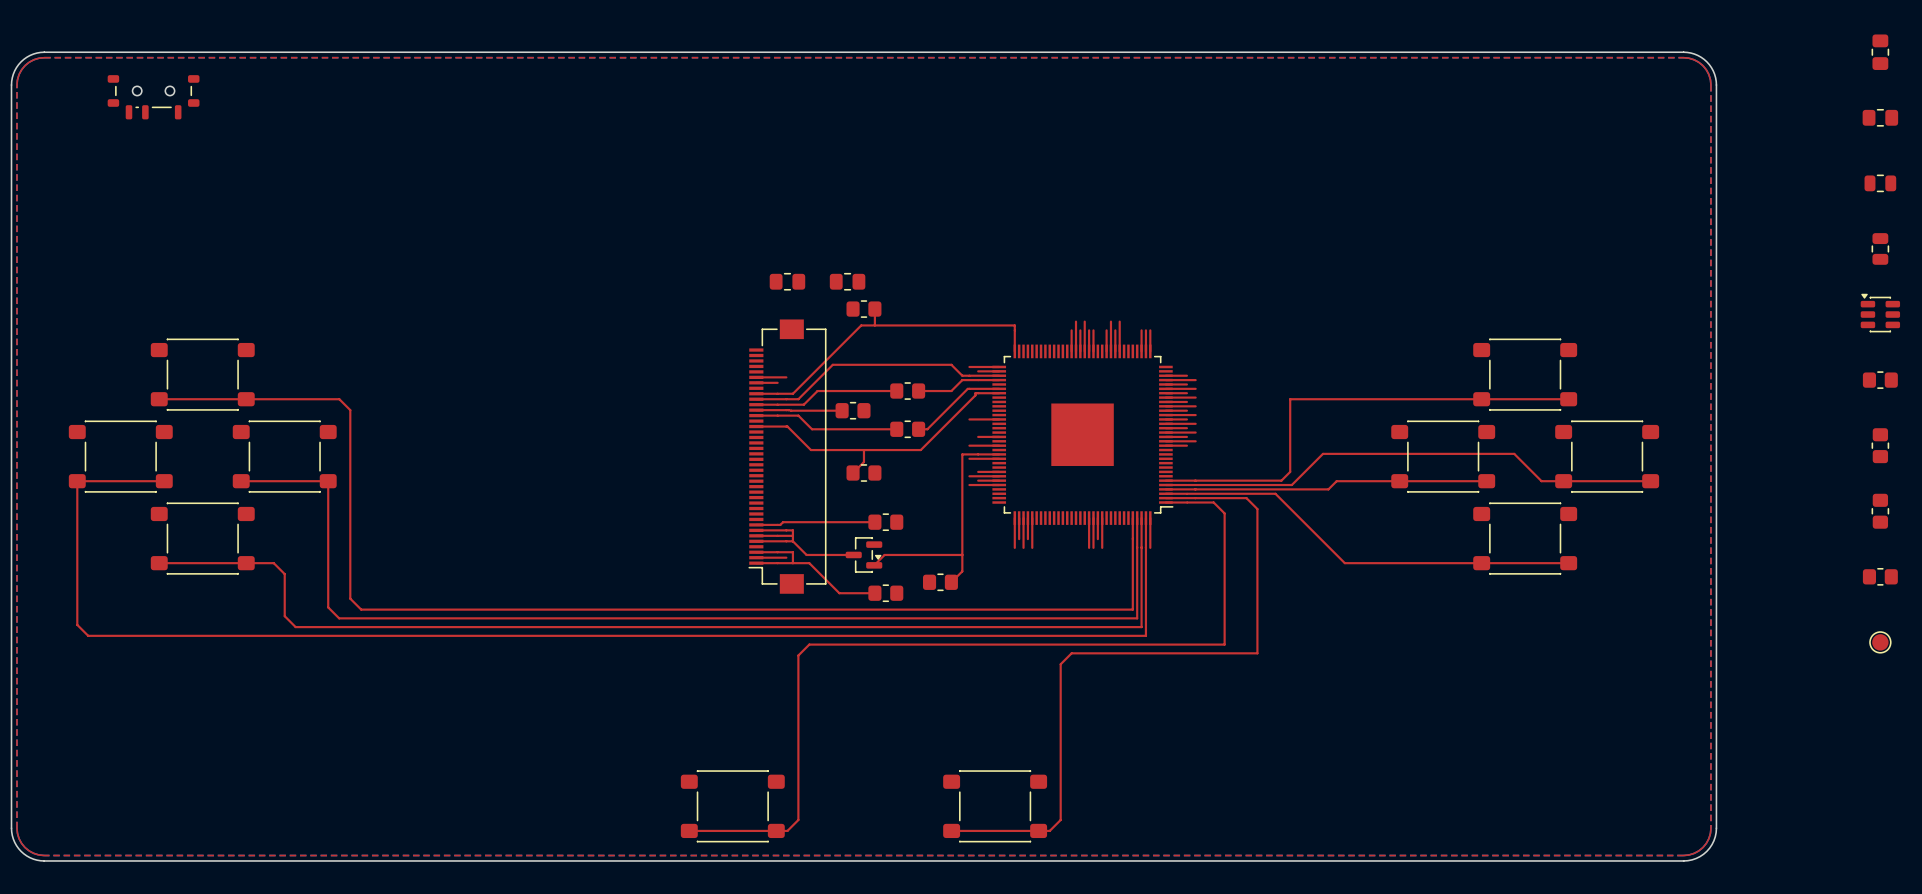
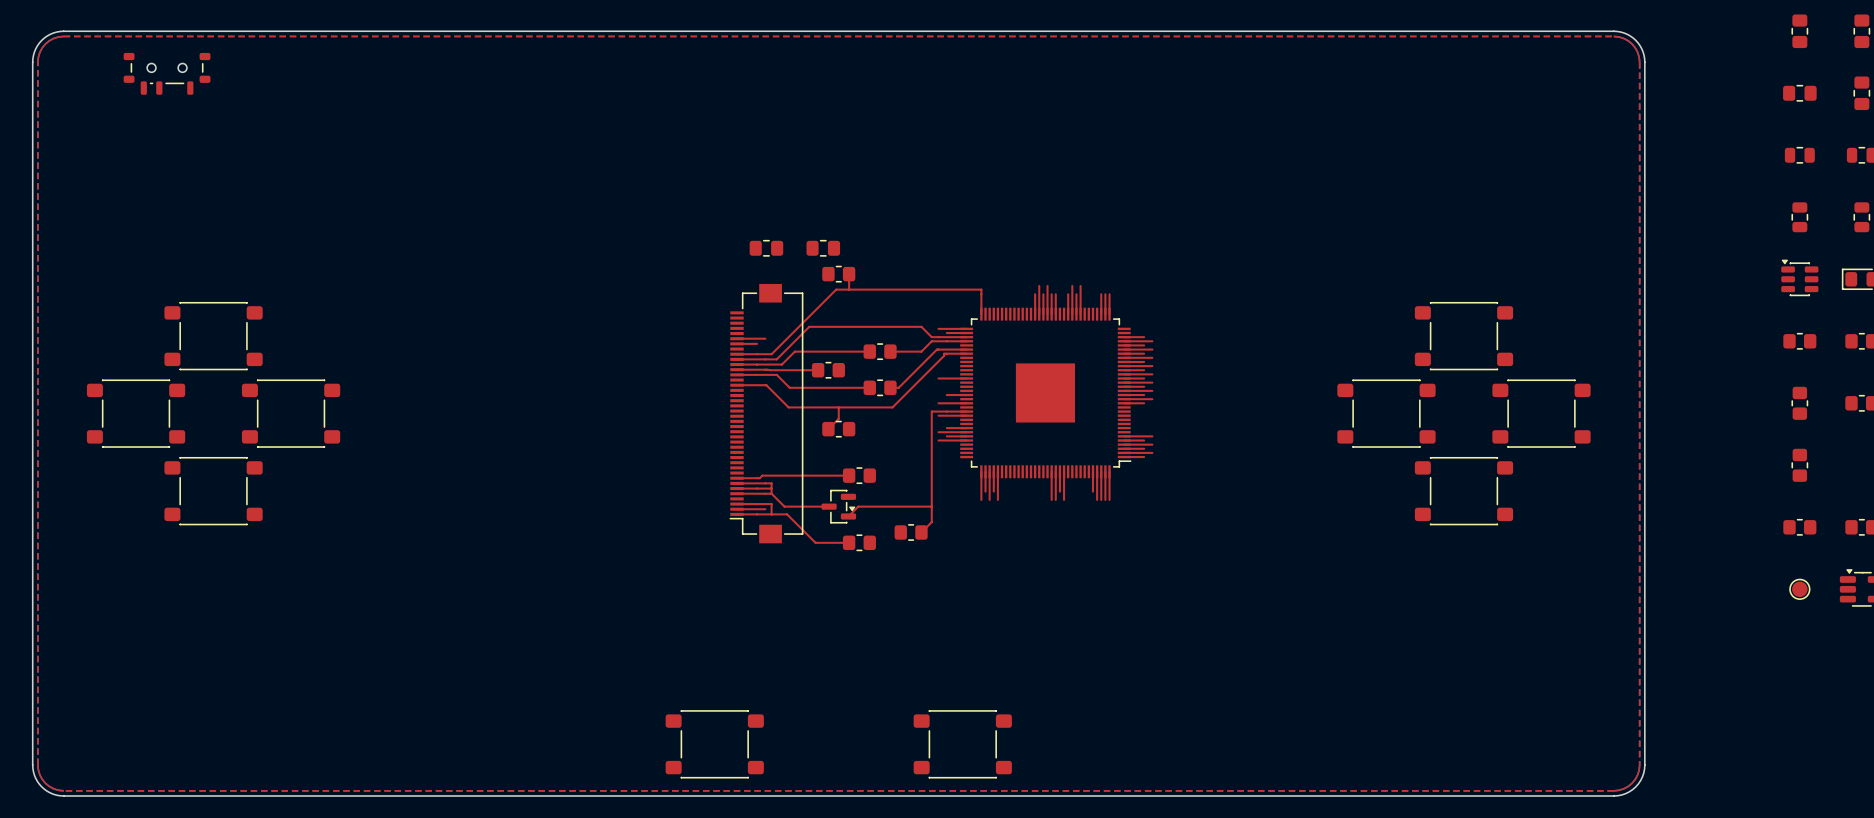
top track: (159, 399) (339, 399) (350, 410) (350, 598) (361, 609) (1132, 609) (1132, 539) -> none
top track: (1568, 399) (1290, 399) (1290, 471) (1281, 480) (1195, 480) -> none
top track: (164, 481) (77, 481) (77, 624) (88, 635) (1145, 635) (1145, 547) -> none
top track: (241, 481) (328, 481) (328, 607) (339, 618) (1137, 618) (1137, 547) -> none
top track: (1486, 481) (1336, 481) (1328, 489) (1195, 489) -> none
top track: (1650, 481) (1541, 481) (1514, 453) (1322, 453) (1291, 485) (1187, 485) -> none
top track: (1187, 493) (1275, 493) (1344, 563) (1568, 563) -> none
top track: (1195, 498) (1246, 498) (1257, 509) (1257, 653) (1071, 653) (1060, 664) (1060, 820) (1049, 830) (951, 830) -> none
top track: (1187, 502) (1213, 502) (1224, 513) (1224, 644) (809, 644) (798, 655) (798, 820) (787, 830) (689, 830) -> none
top track: (1141, 547) (1141, 627) (295, 627) (284, 616) (284, 574) (273, 563) (159, 563) -> none

